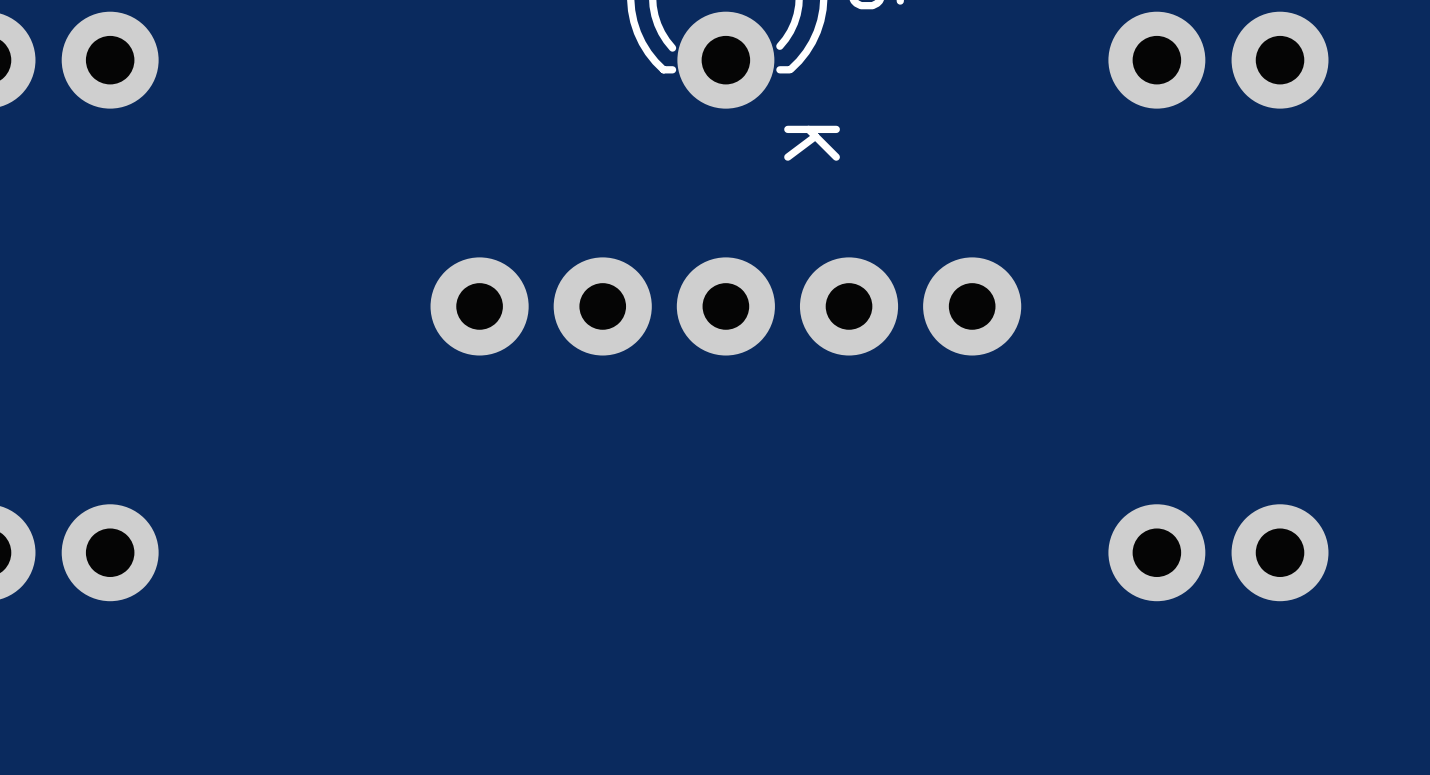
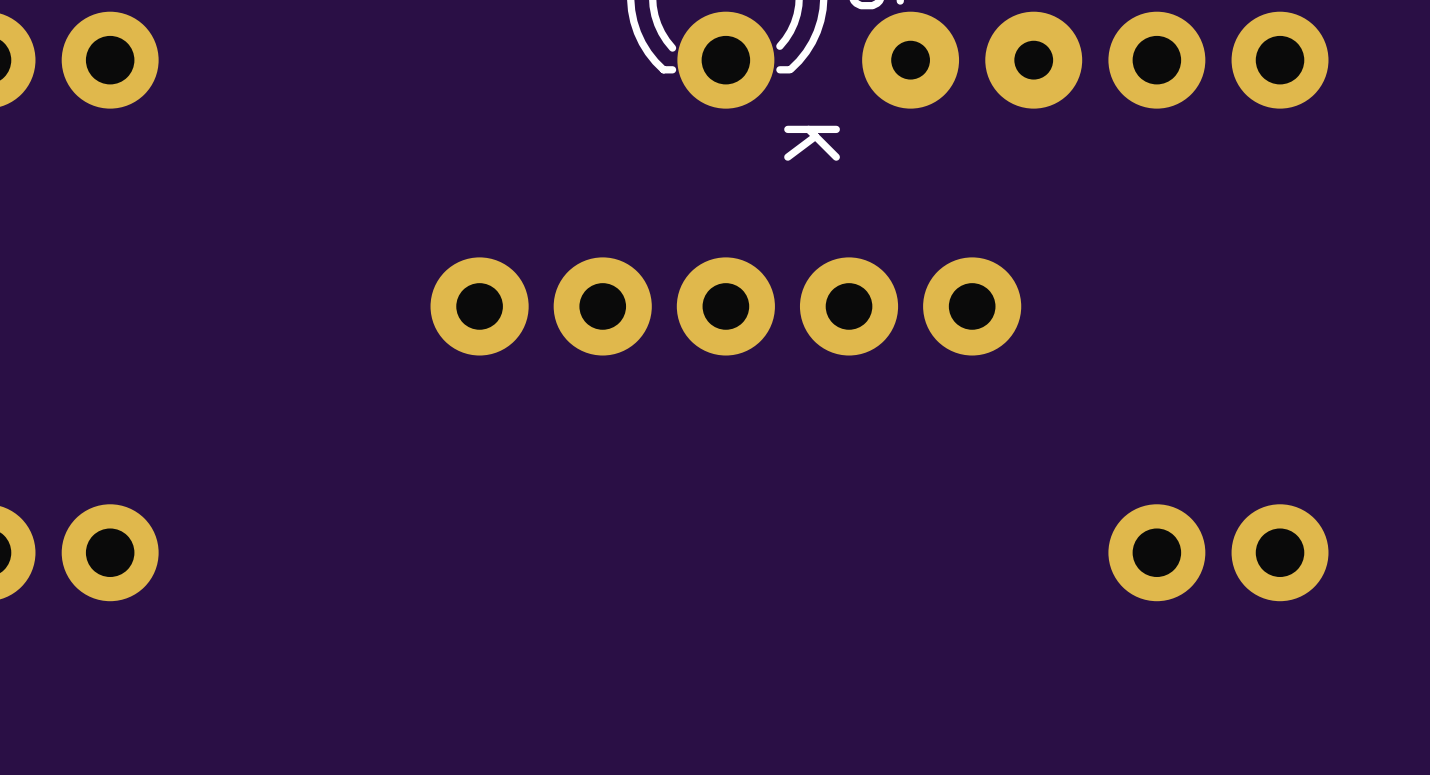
part: none -> (972, 60)

